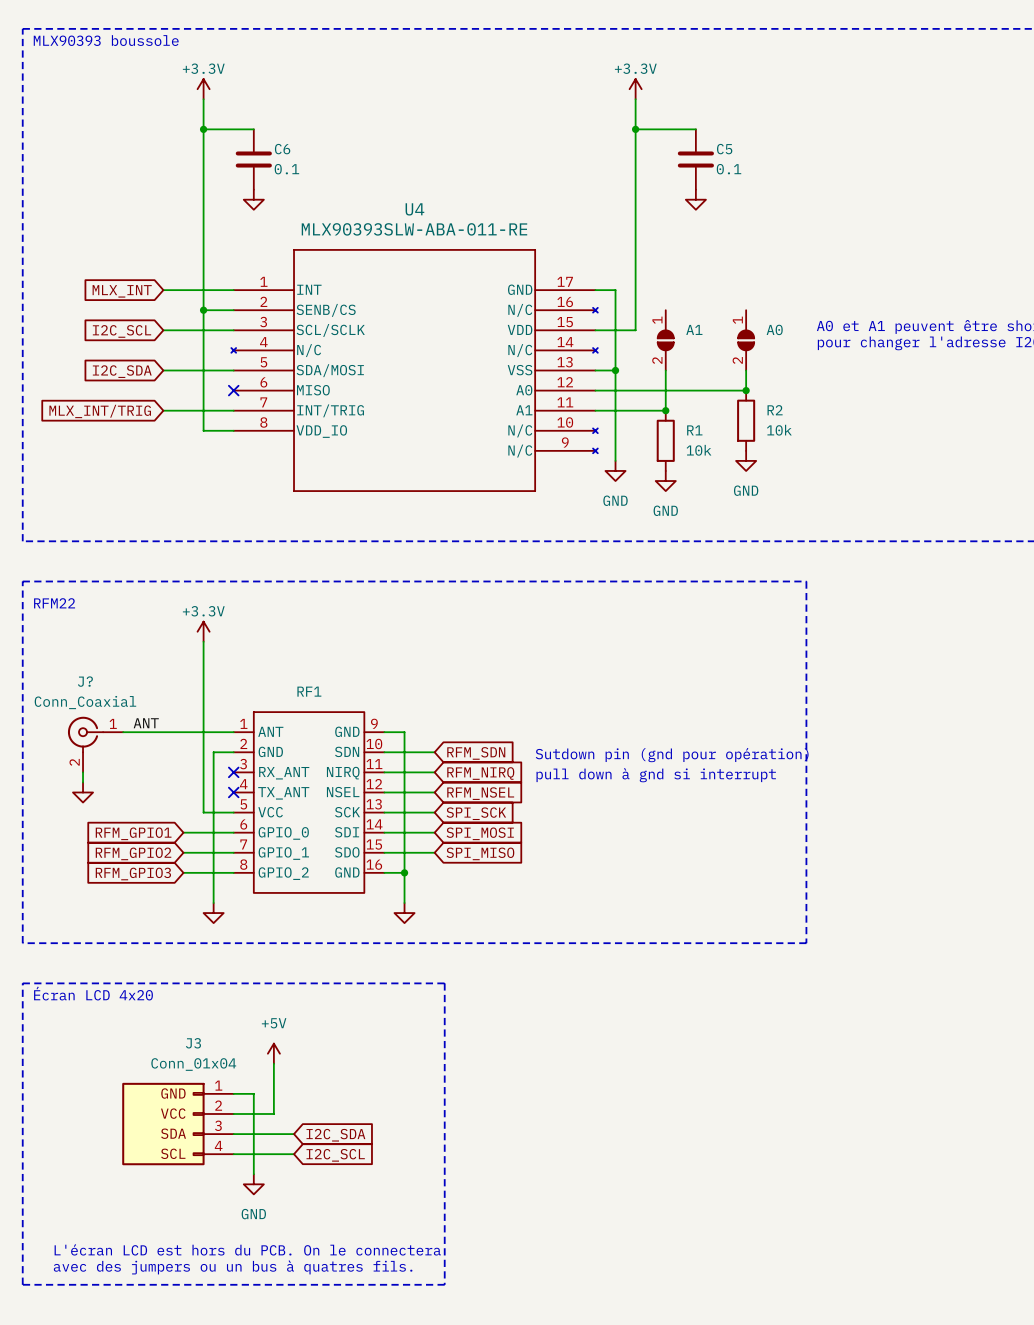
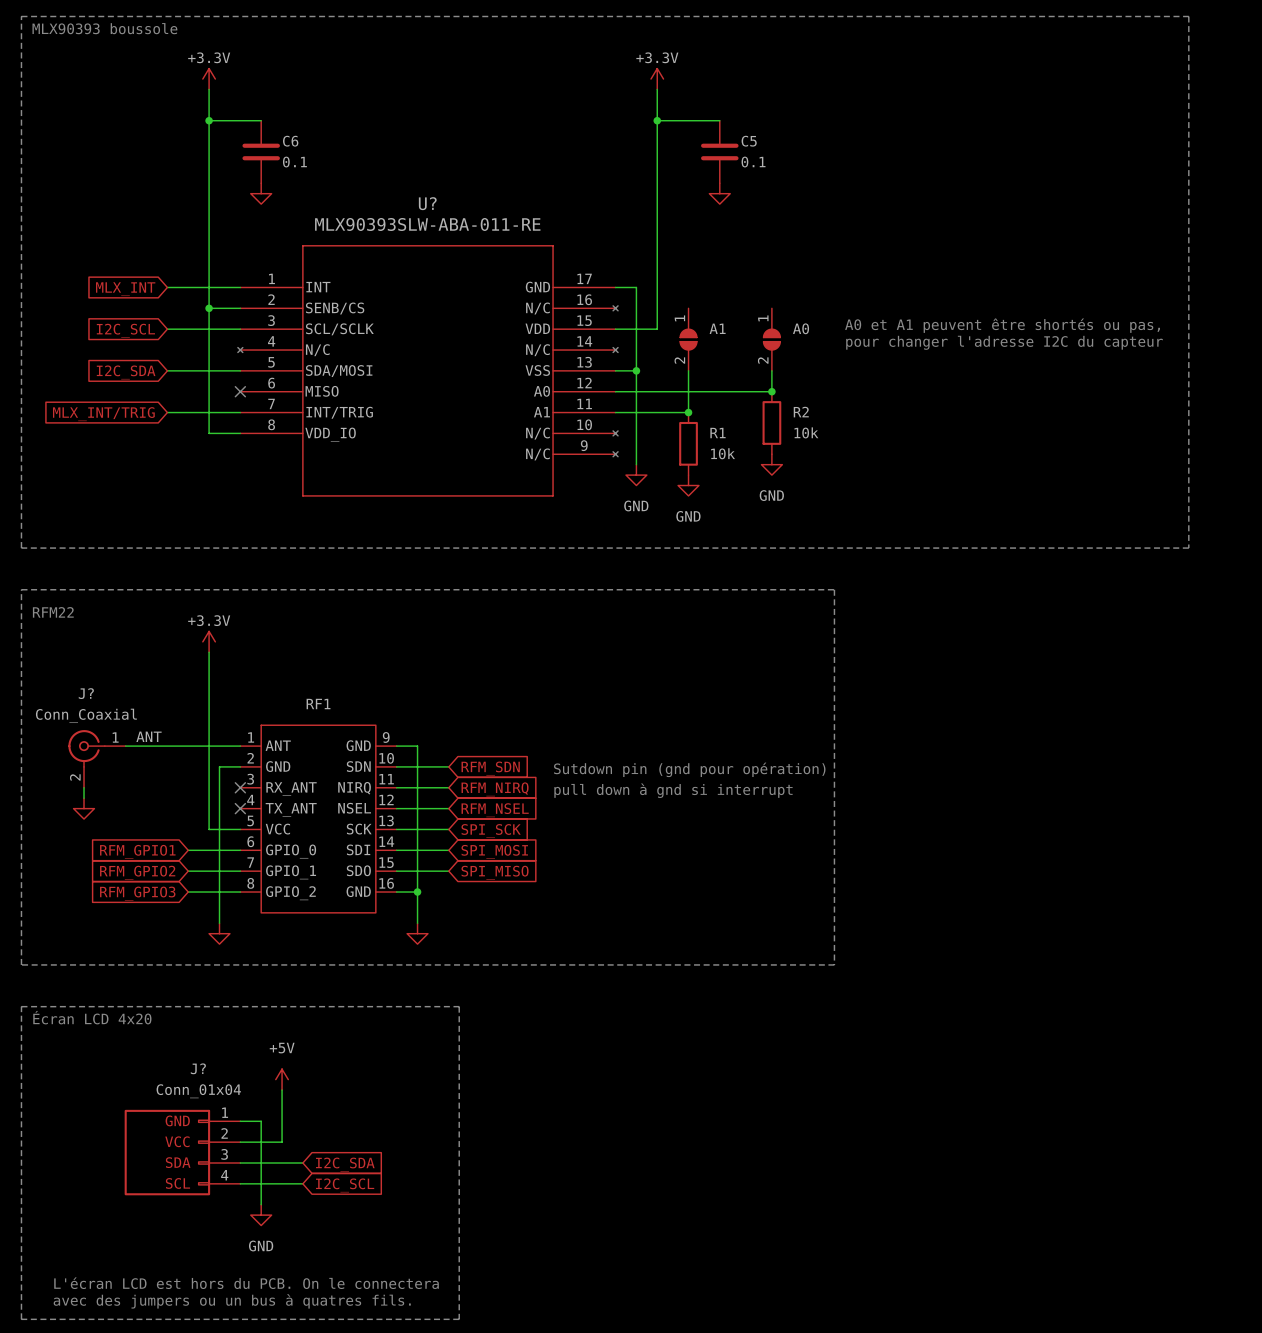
U4 name: U4 (414, 209) -> U? (427, 203)
J3 name: J3 (193, 1043) -> J? (198, 1068)

